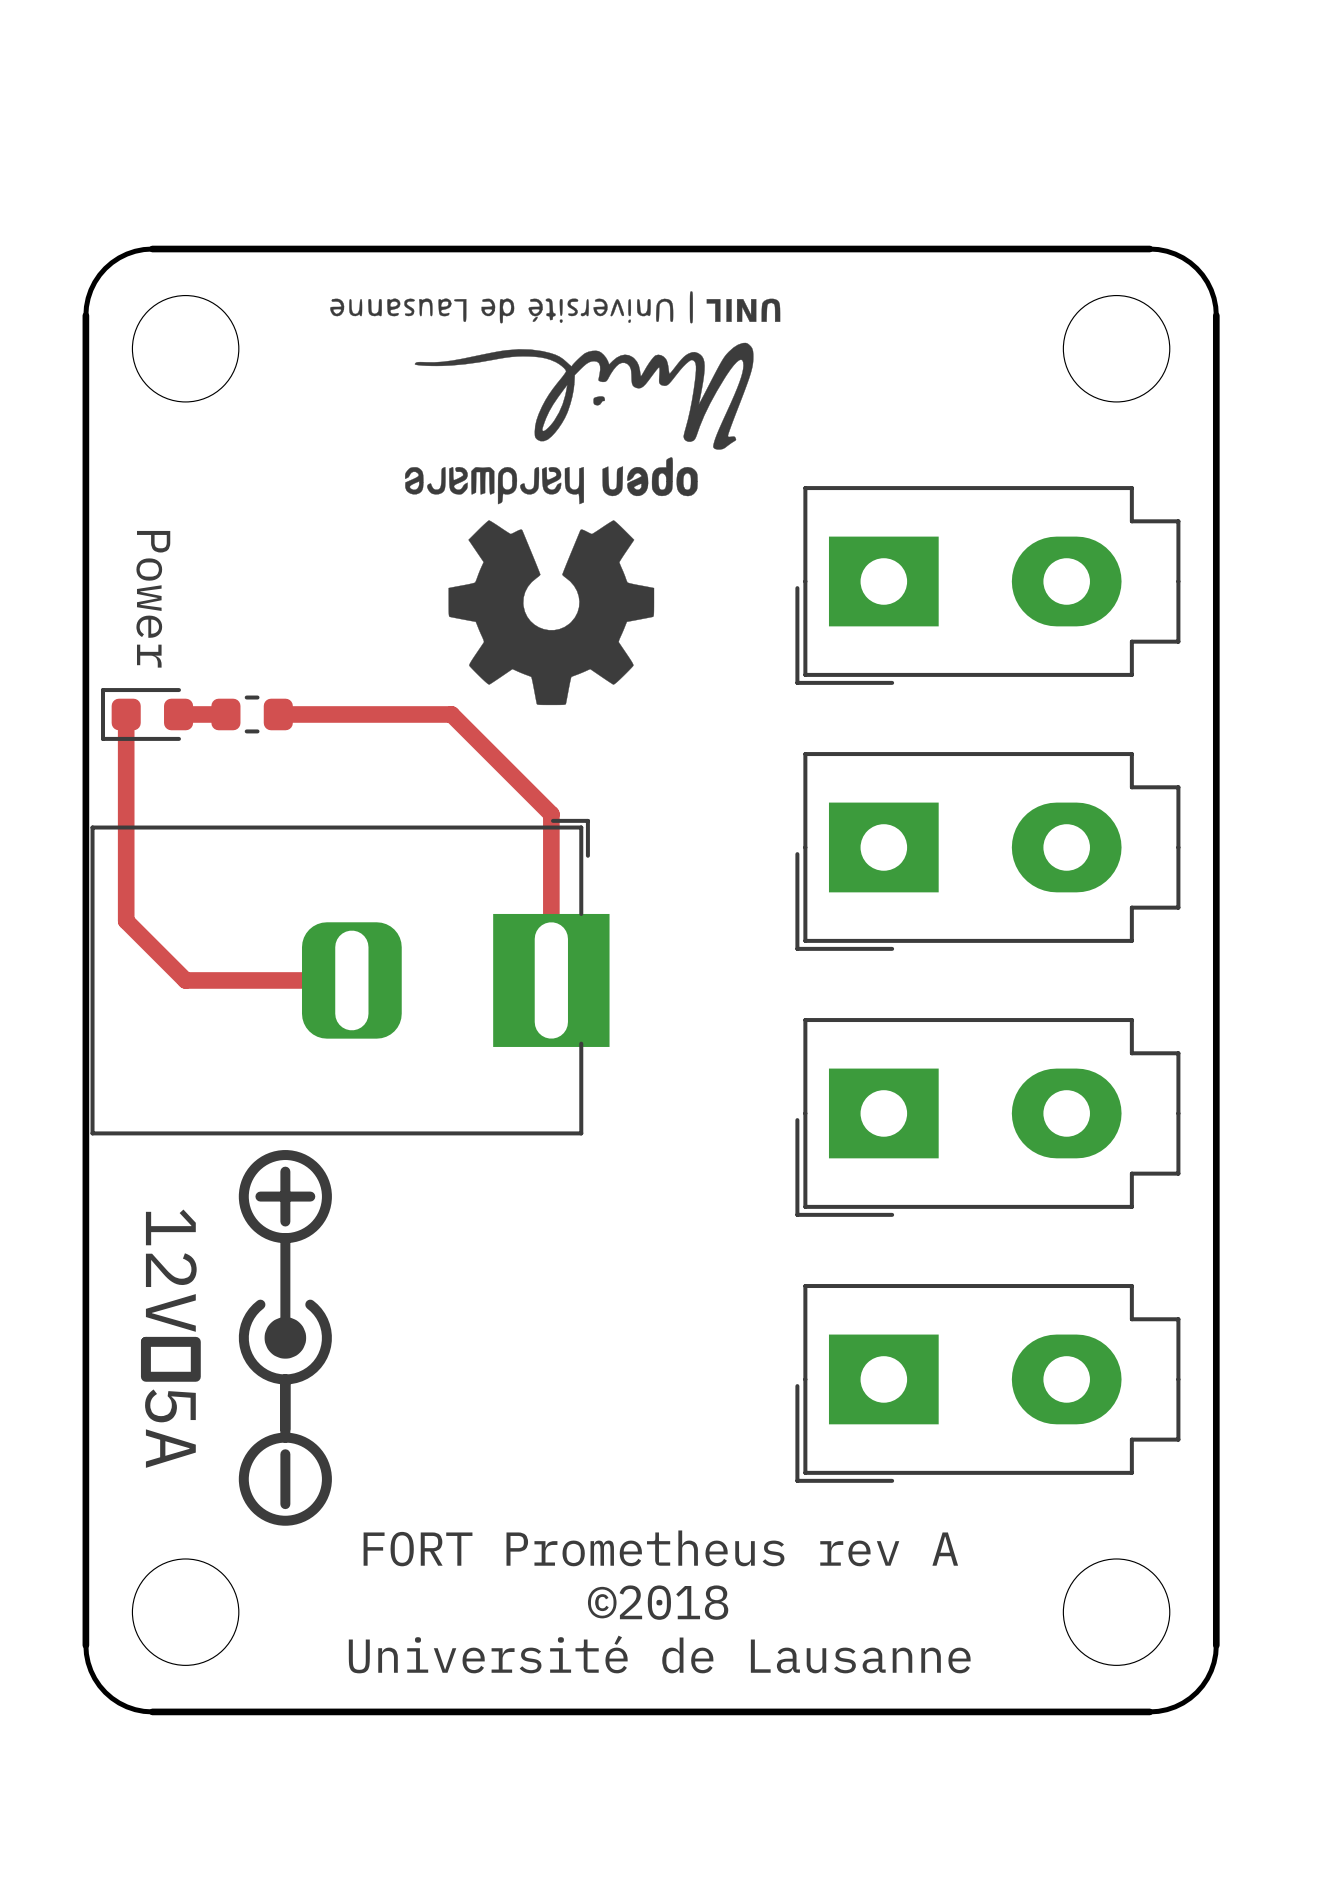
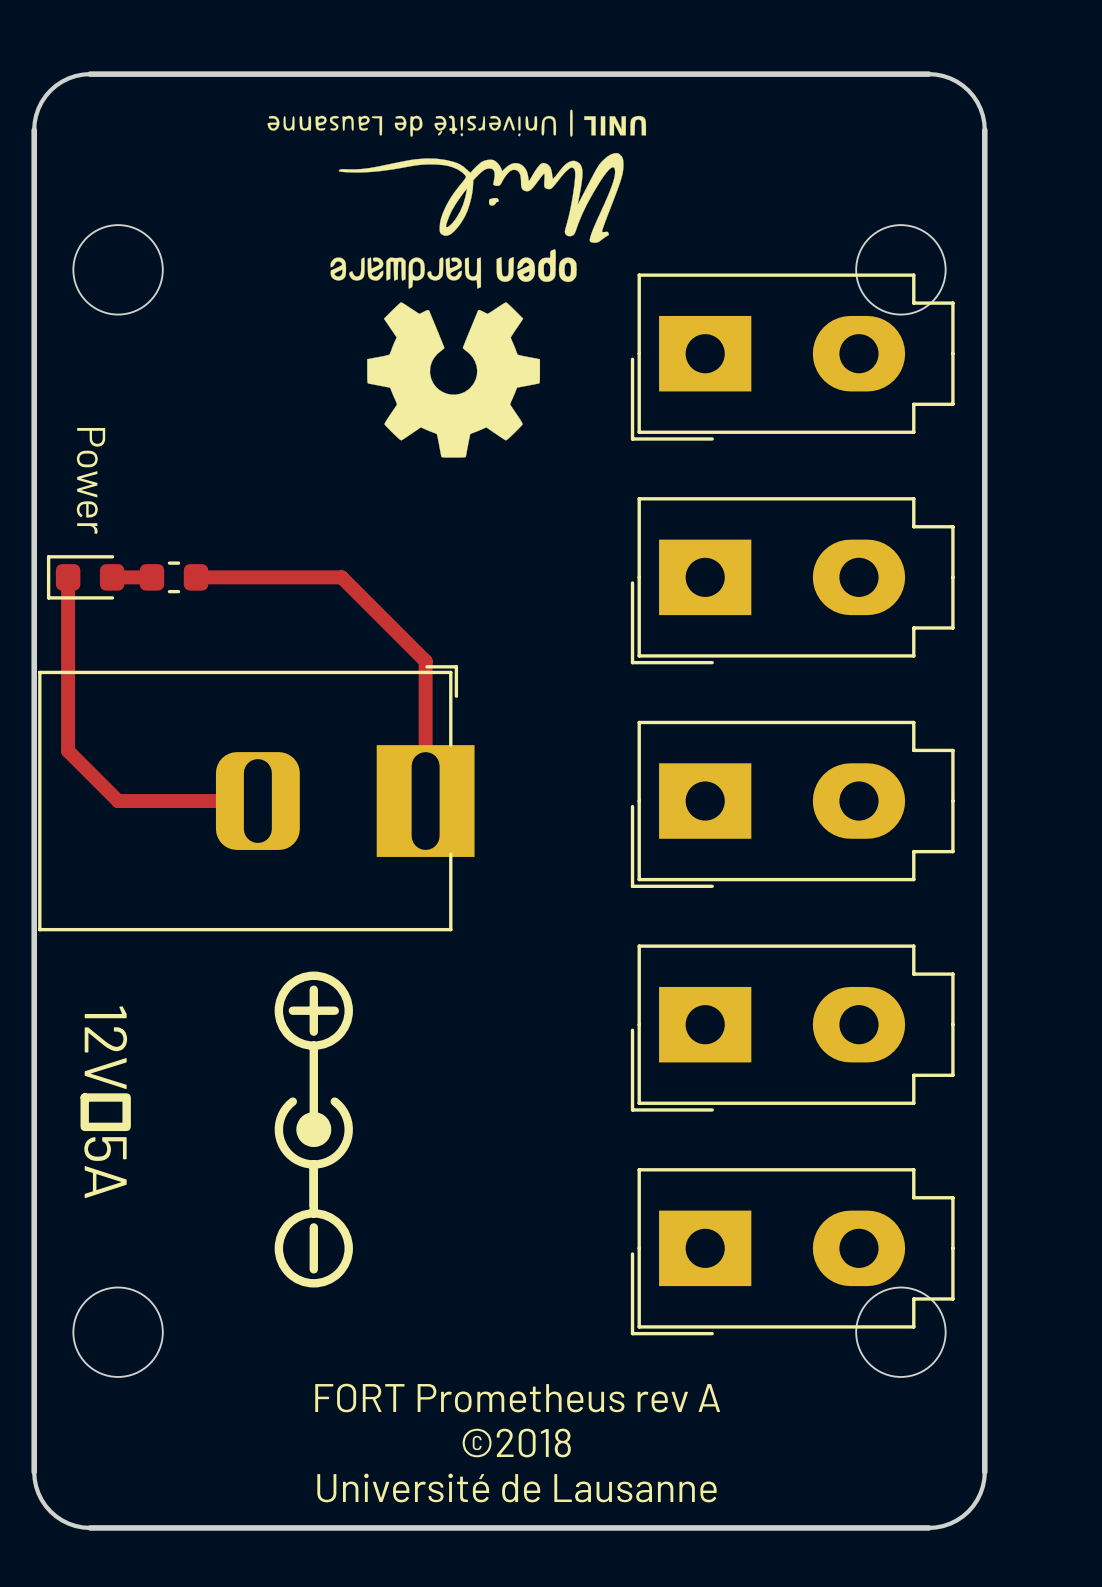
board edge: (85, 315) (90, 290) (105, 268) (126, 254) (152, 249) (1149, 249) (1175, 254) (1196, 268) (1211, 290) (1216, 315) -> (34, 241) (34, 130) (36, 115) (41, 102) (56, 85) (68, 78) (90, 74) (936, 74) (956, 81) (968, 90) (977, 102) (982, 115) (984, 130) (984, 241)
drawing position: (555, 370) -> (456, 176)
part: none -> (792, 357)
drawing position: (551, 581) -> (453, 353)
part: (987, 585) -> none
part: none -> (792, 580)
part: (987, 851) -> none
part: none -> (792, 804)
part: (987, 1117) -> none
line: (285, 1171) (285, 1221) -> (313, 989) (313, 1031)
line: (260, 1196) (310, 1196) -> (292, 1010) (334, 1010)
drawing position: (285, 1196) -> (313, 1010)
line: (285, 1238) (285, 1337) -> (313, 1045) (313, 1129)
part: none -> (792, 1028)
line: (260, 1304) (249, 1316) (245, 1325) (243, 1335) (245, 1351) (253, 1364) (261, 1371) (275, 1378) (285, 1379) (300, 1376) (309, 1371) (320, 1360) (324, 1351) (326, 1335) (325, 1325) (320, 1316) (310, 1304) -> (292, 1101) (284, 1111) (280, 1119) (278, 1127) (280, 1140) (286, 1151) (293, 1157) (305, 1163) (313, 1164) (326, 1162) (334, 1157) (343, 1148) (346, 1140) (348, 1127) (347, 1119) (343, 1111) (334, 1101)
drawing position: (285, 1337) -> (313, 1129)
line: (285, 1379) (285, 1437) -> (313, 1164) (313, 1213)
part: (987, 1383) -> none
line: (285, 1454) (285, 1504) -> (313, 1227) (313, 1269)
drawing position: (285, 1479) -> (313, 1248)
part: none -> (792, 1251)
text position: FORT Prometheus rev A (660, 1548) -> FORT Prometheus rev A (517, 1398)
text position: ©2018 (658, 1602) -> ©2018 (516, 1443)
board edge: (85, 1645) (90, 1670) (105, 1692) (126, 1706) (152, 1711) (1149, 1711) (1175, 1706) (1196, 1692) (1211, 1670) (1216, 1645) -> (34, 1360) (34, 1472) (36, 1486) (41, 1499) (56, 1516) (68, 1523) (90, 1527) (936, 1527) (956, 1520) (968, 1511) (977, 1499) (982, 1486) (984, 1472) (984, 1360)
text position: Université de Lausanne (659, 1654) -> Université de Lausanne (516, 1488)

